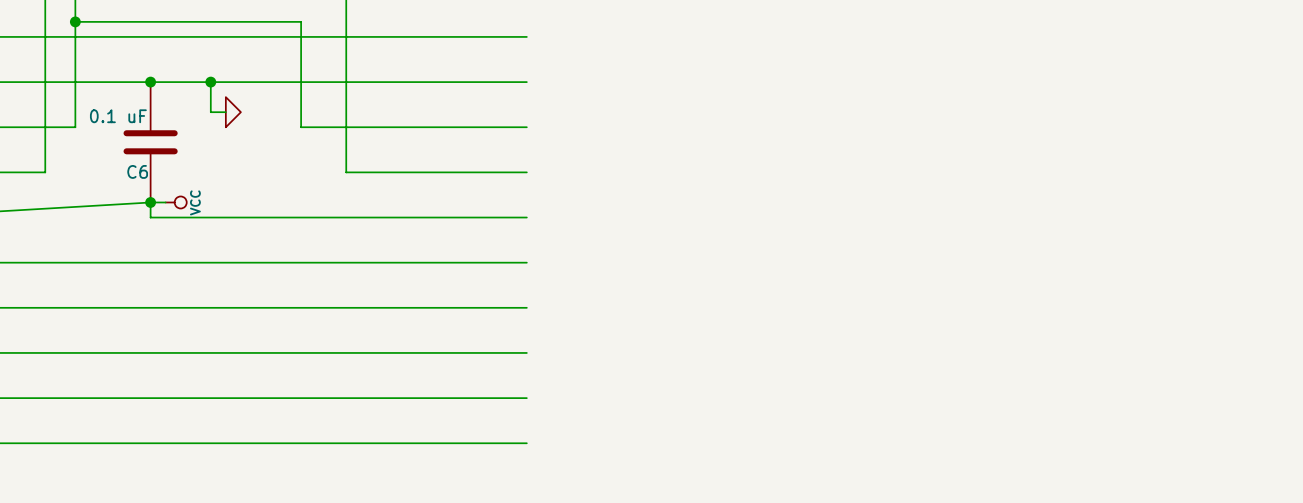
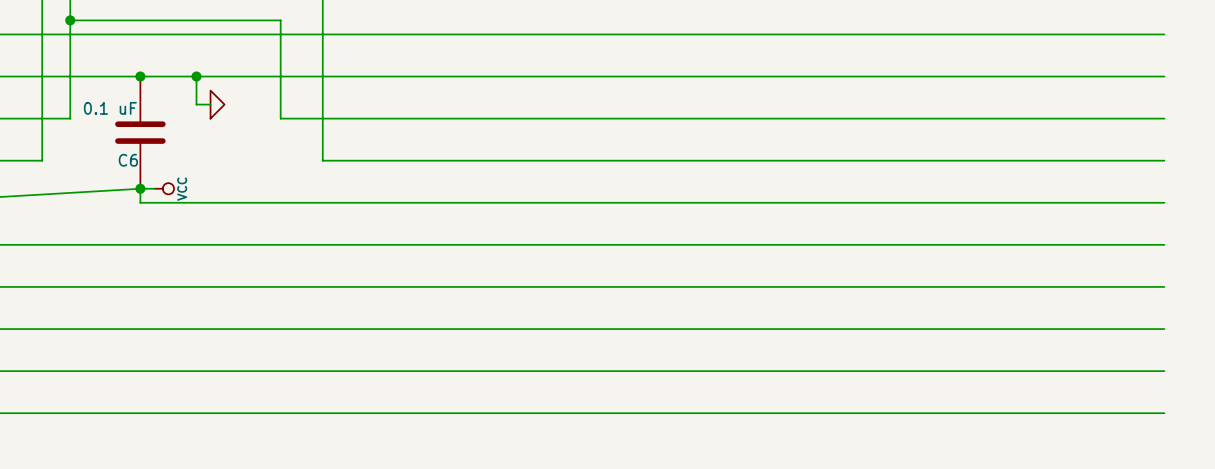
wire: none -> (491, 34) (1164, 34)
wire: none -> (491, 76) (1164, 76)
wire: none -> (491, 118) (1164, 118)
wire: none -> (491, 160) (1164, 160)
wire: none -> (491, 202) (1164, 202)
wire: none -> (491, 244) (1164, 244)
wire: none -> (491, 286) (1164, 286)
wire: none -> (491, 329) (1164, 329)
wire: none -> (491, 371) (1164, 371)
wire: none -> (491, 413) (1164, 413)

